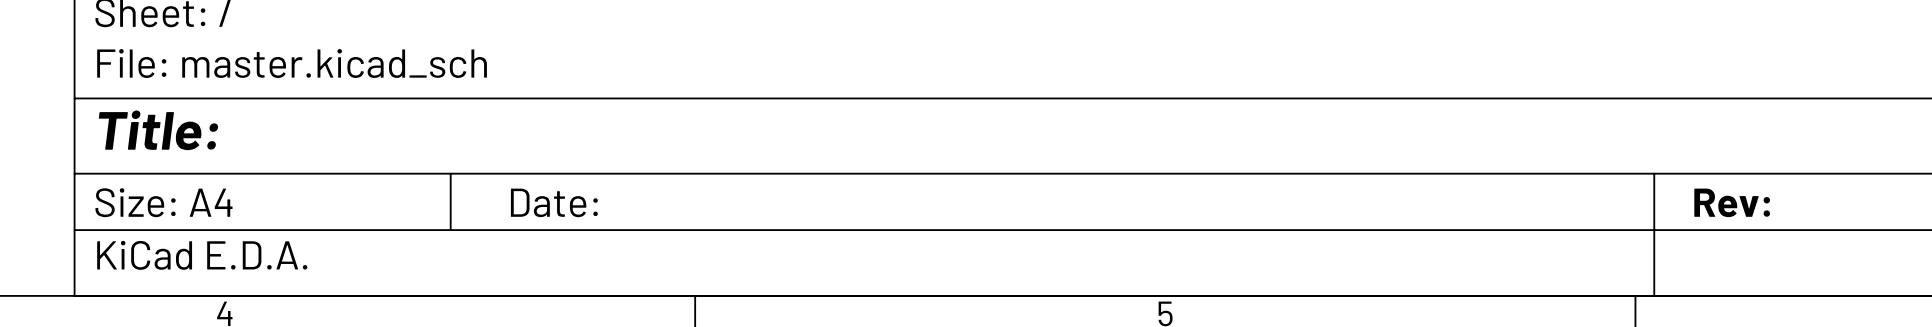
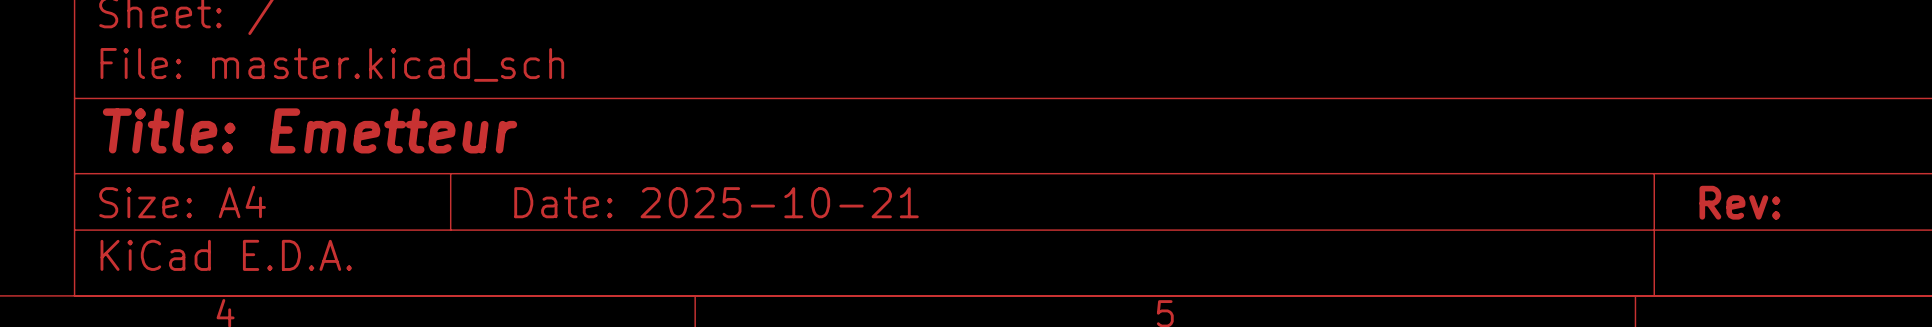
title block: Title: (158, 130) -> Title: Emetteur (310, 130)
title block: Date: (554, 202) -> Date: 2025-10-21 (716, 202)

